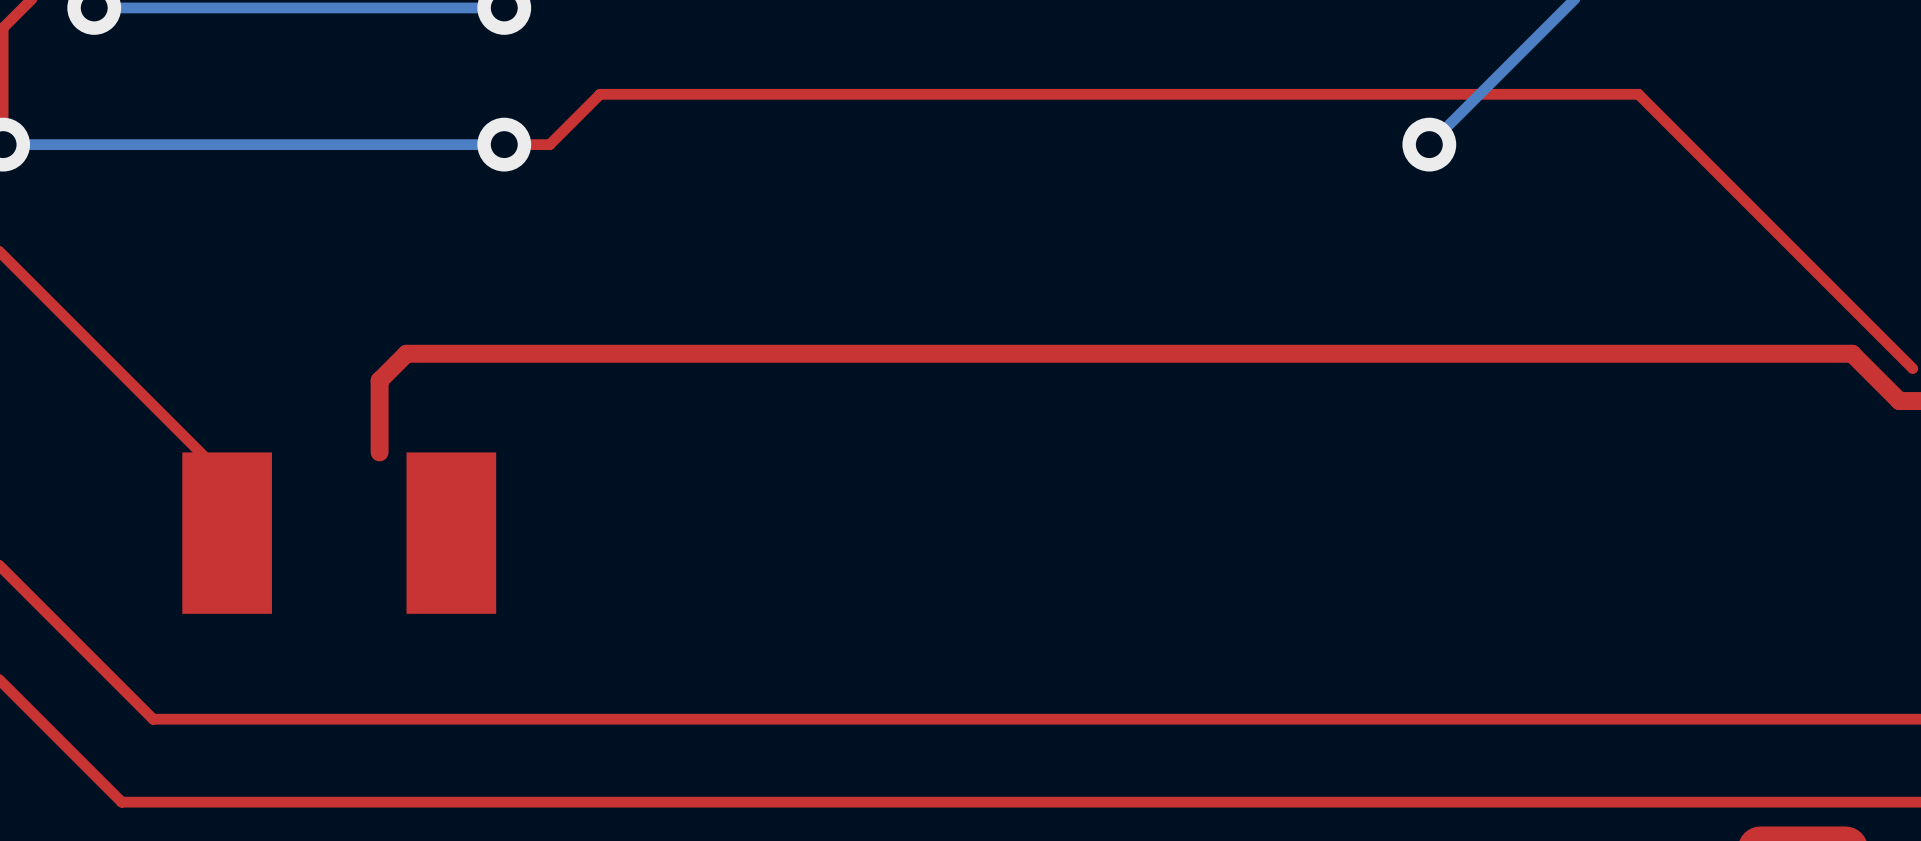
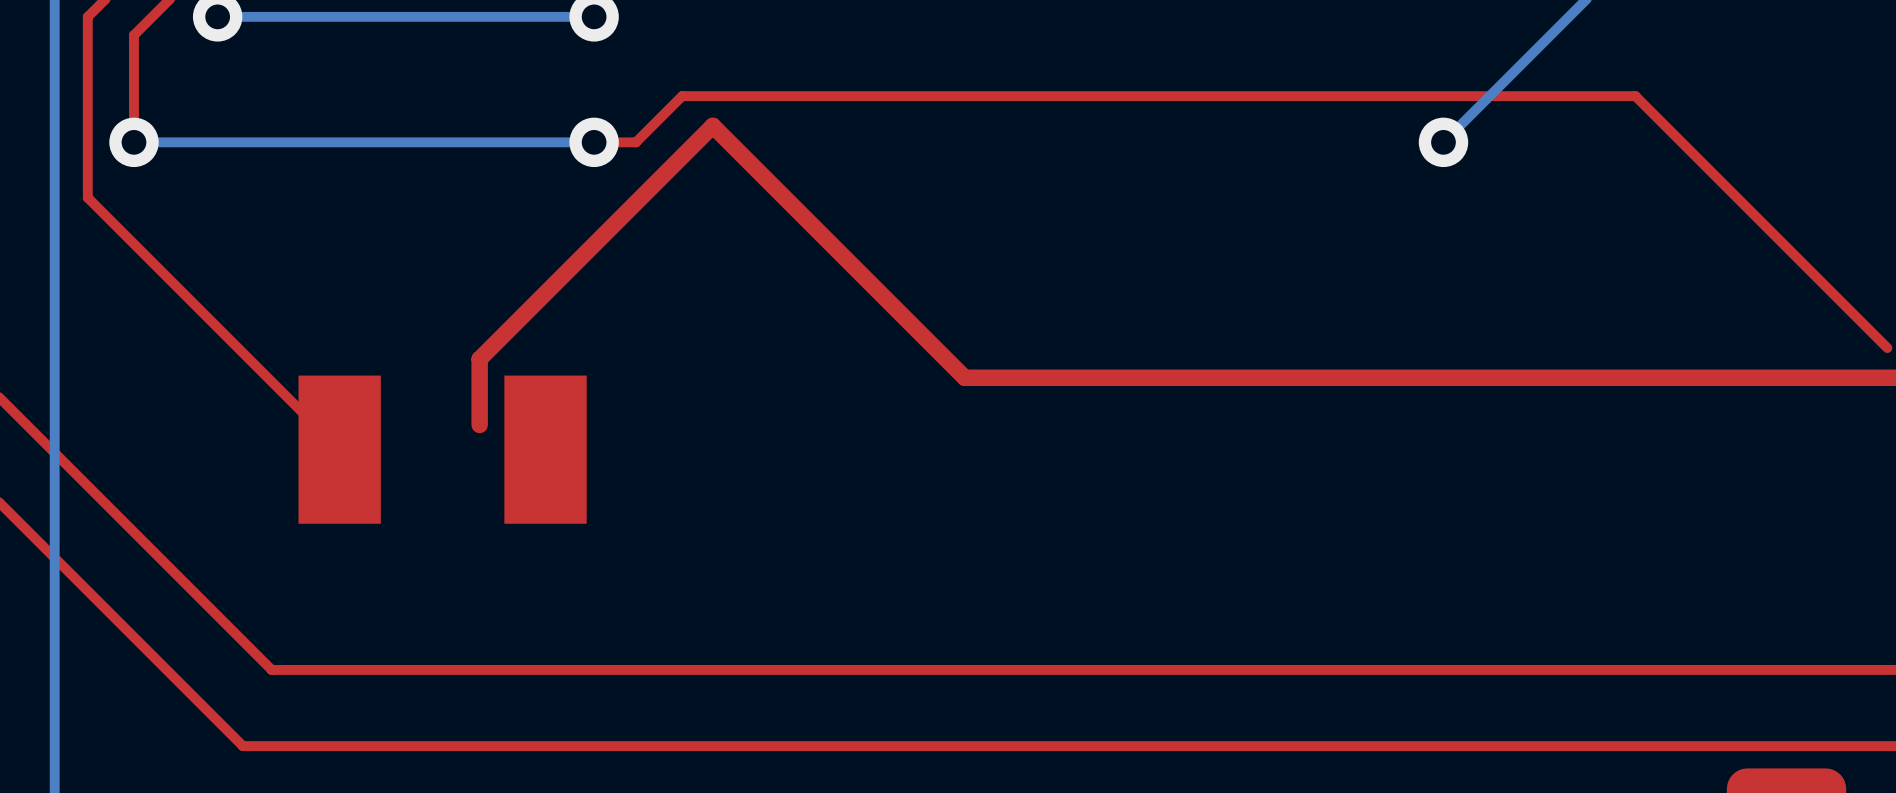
top track: (406, 353) (1852, 353) (1899, 401) -> (504, 334) (712, 125) (964, 377) (1875, 377)
part position: (339, 533) -> (442, 449)

